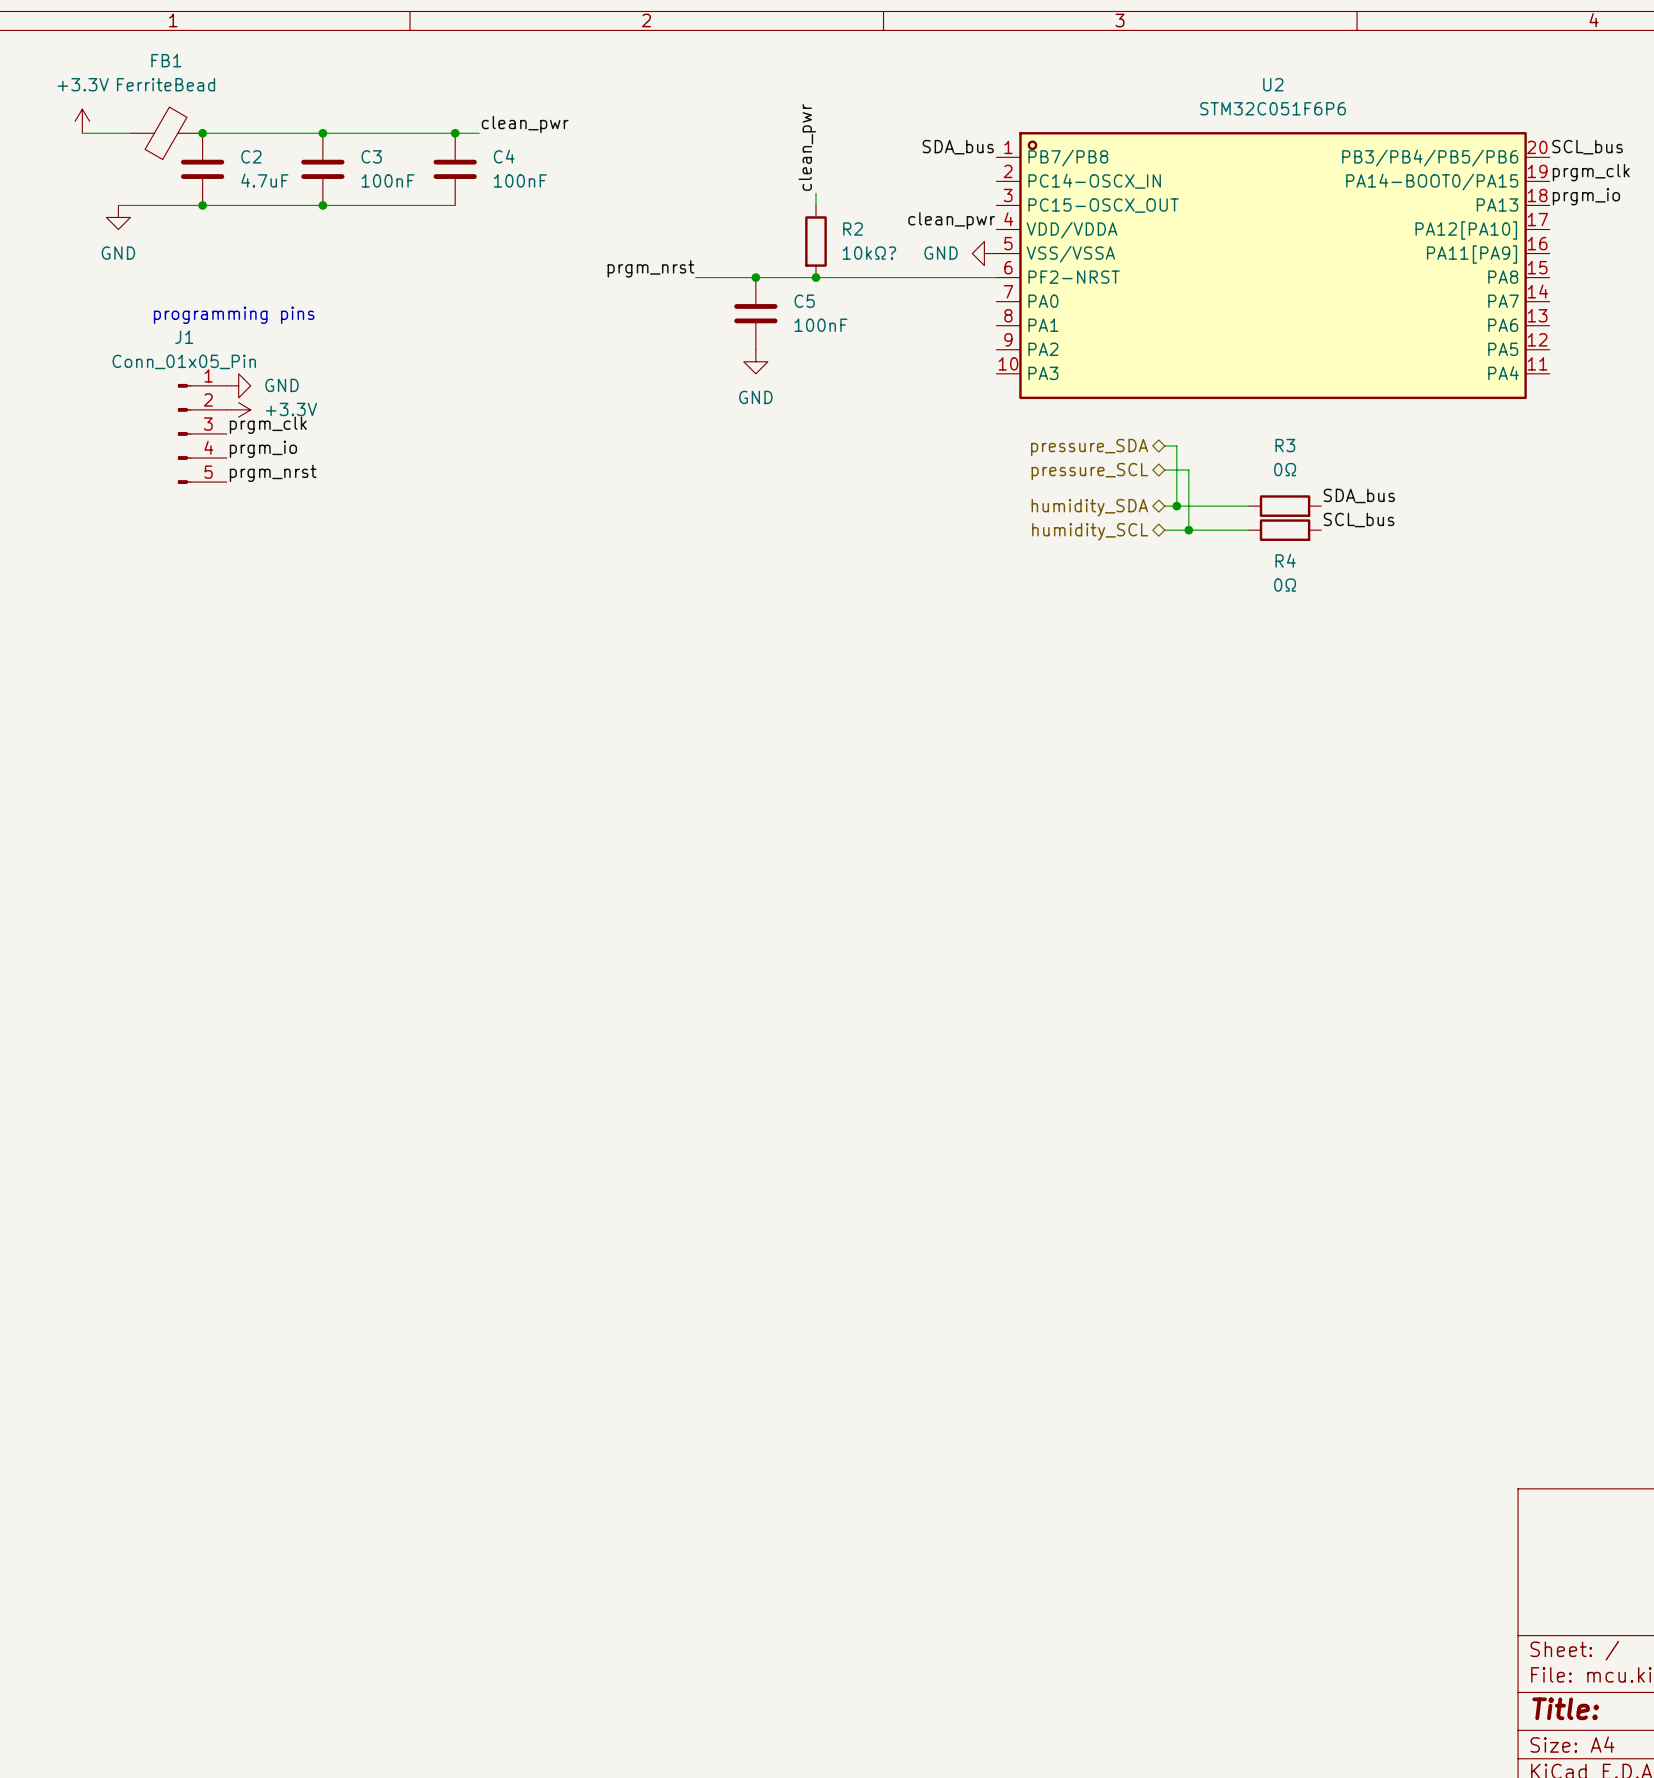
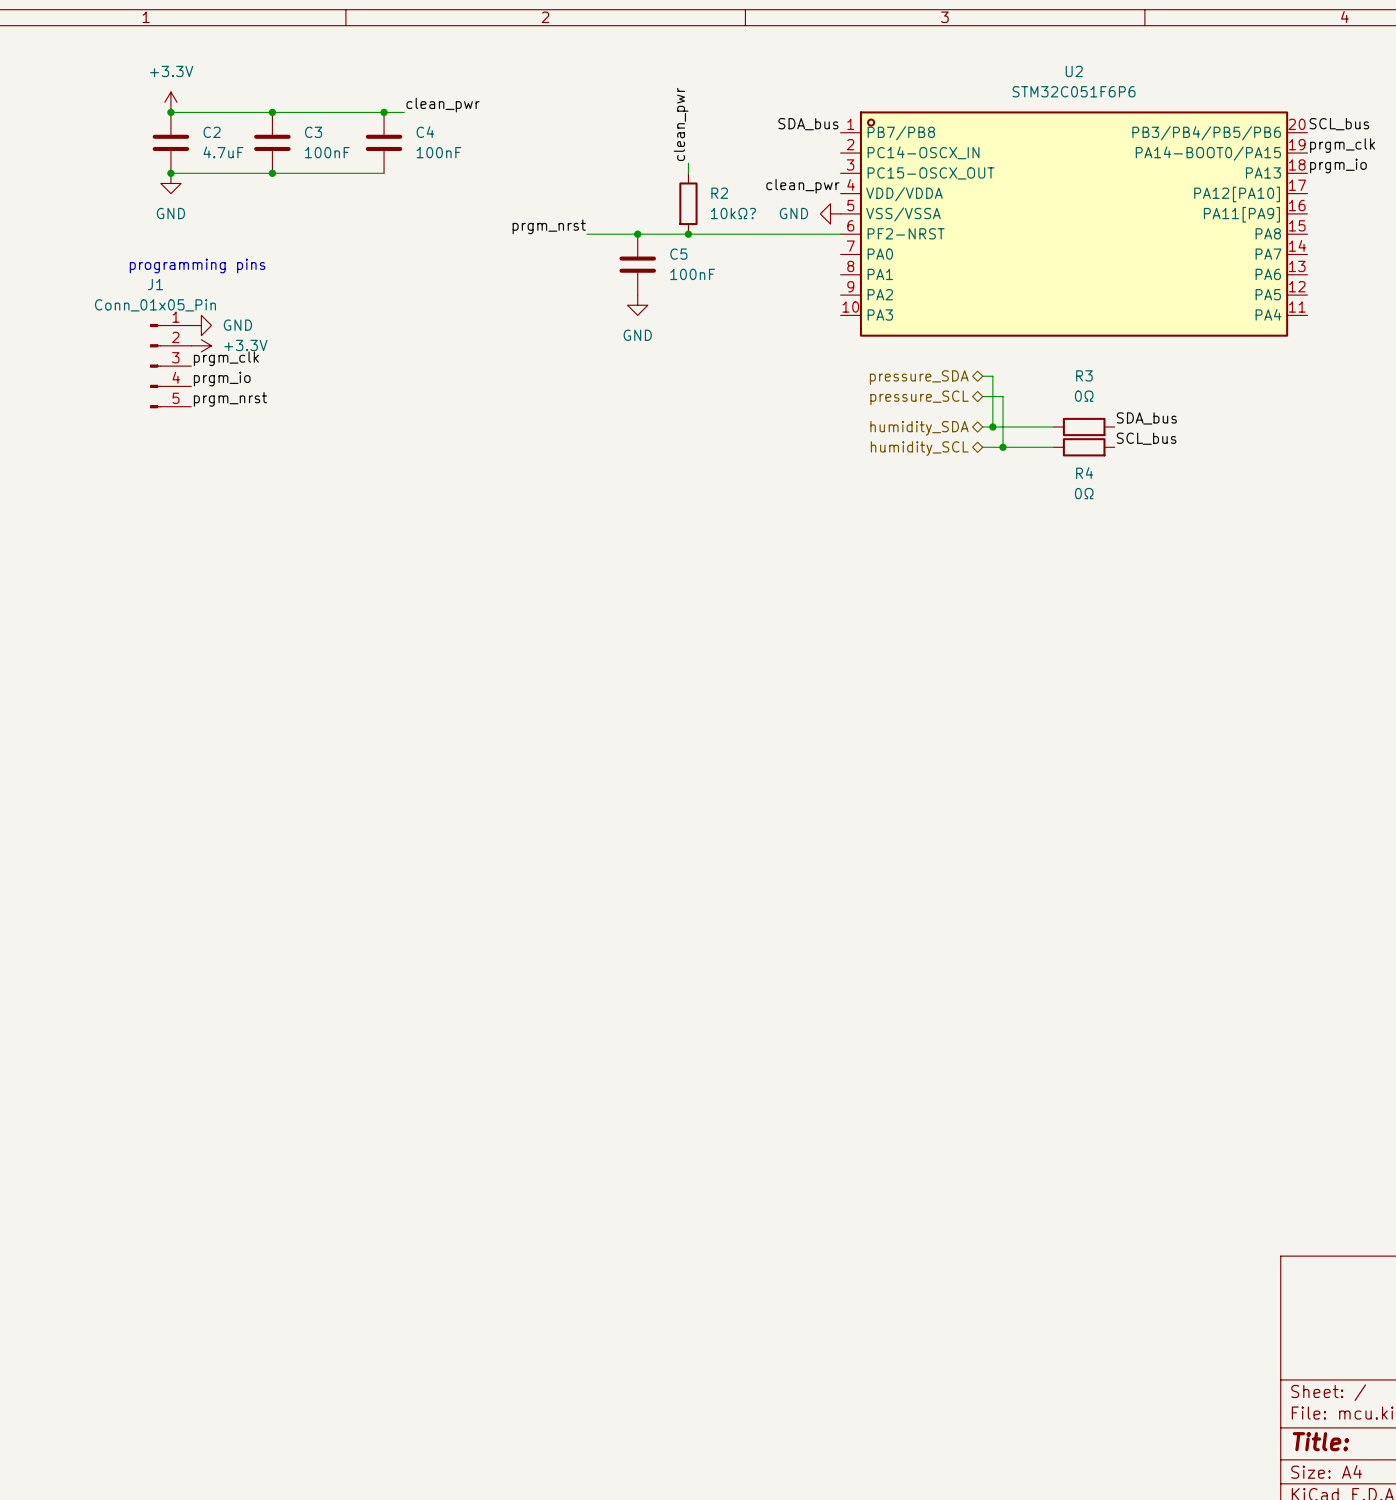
power symbol position: +3.3V (82, 121) -> +3.3V (170, 102)
wire: (82, 133) (130, 133) -> none
FB1: FerriteBead (166, 133) -> none
wire: (118, 205) (202, 205) -> none
power symbol position: GND (118, 217) -> GND (170, 183)

